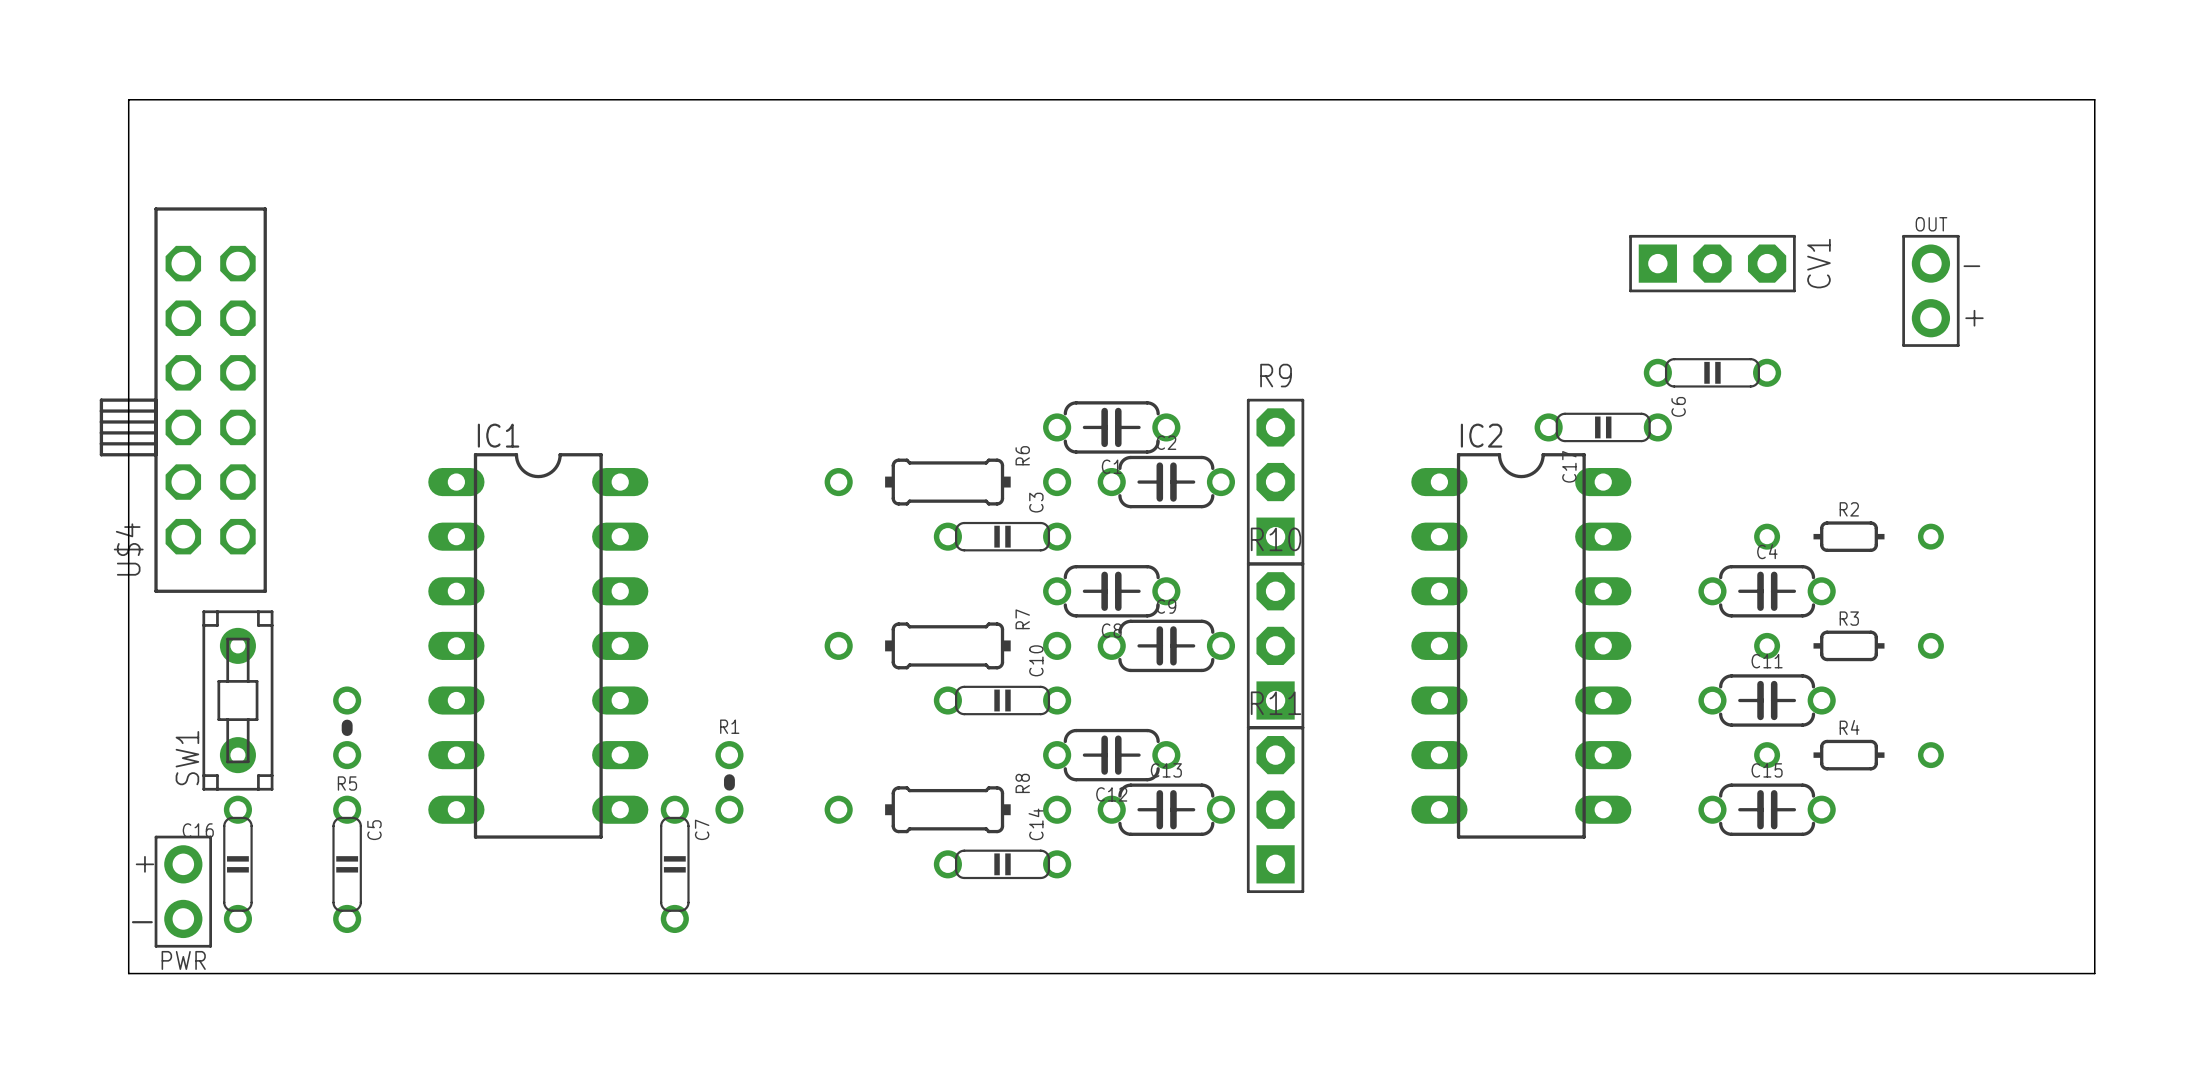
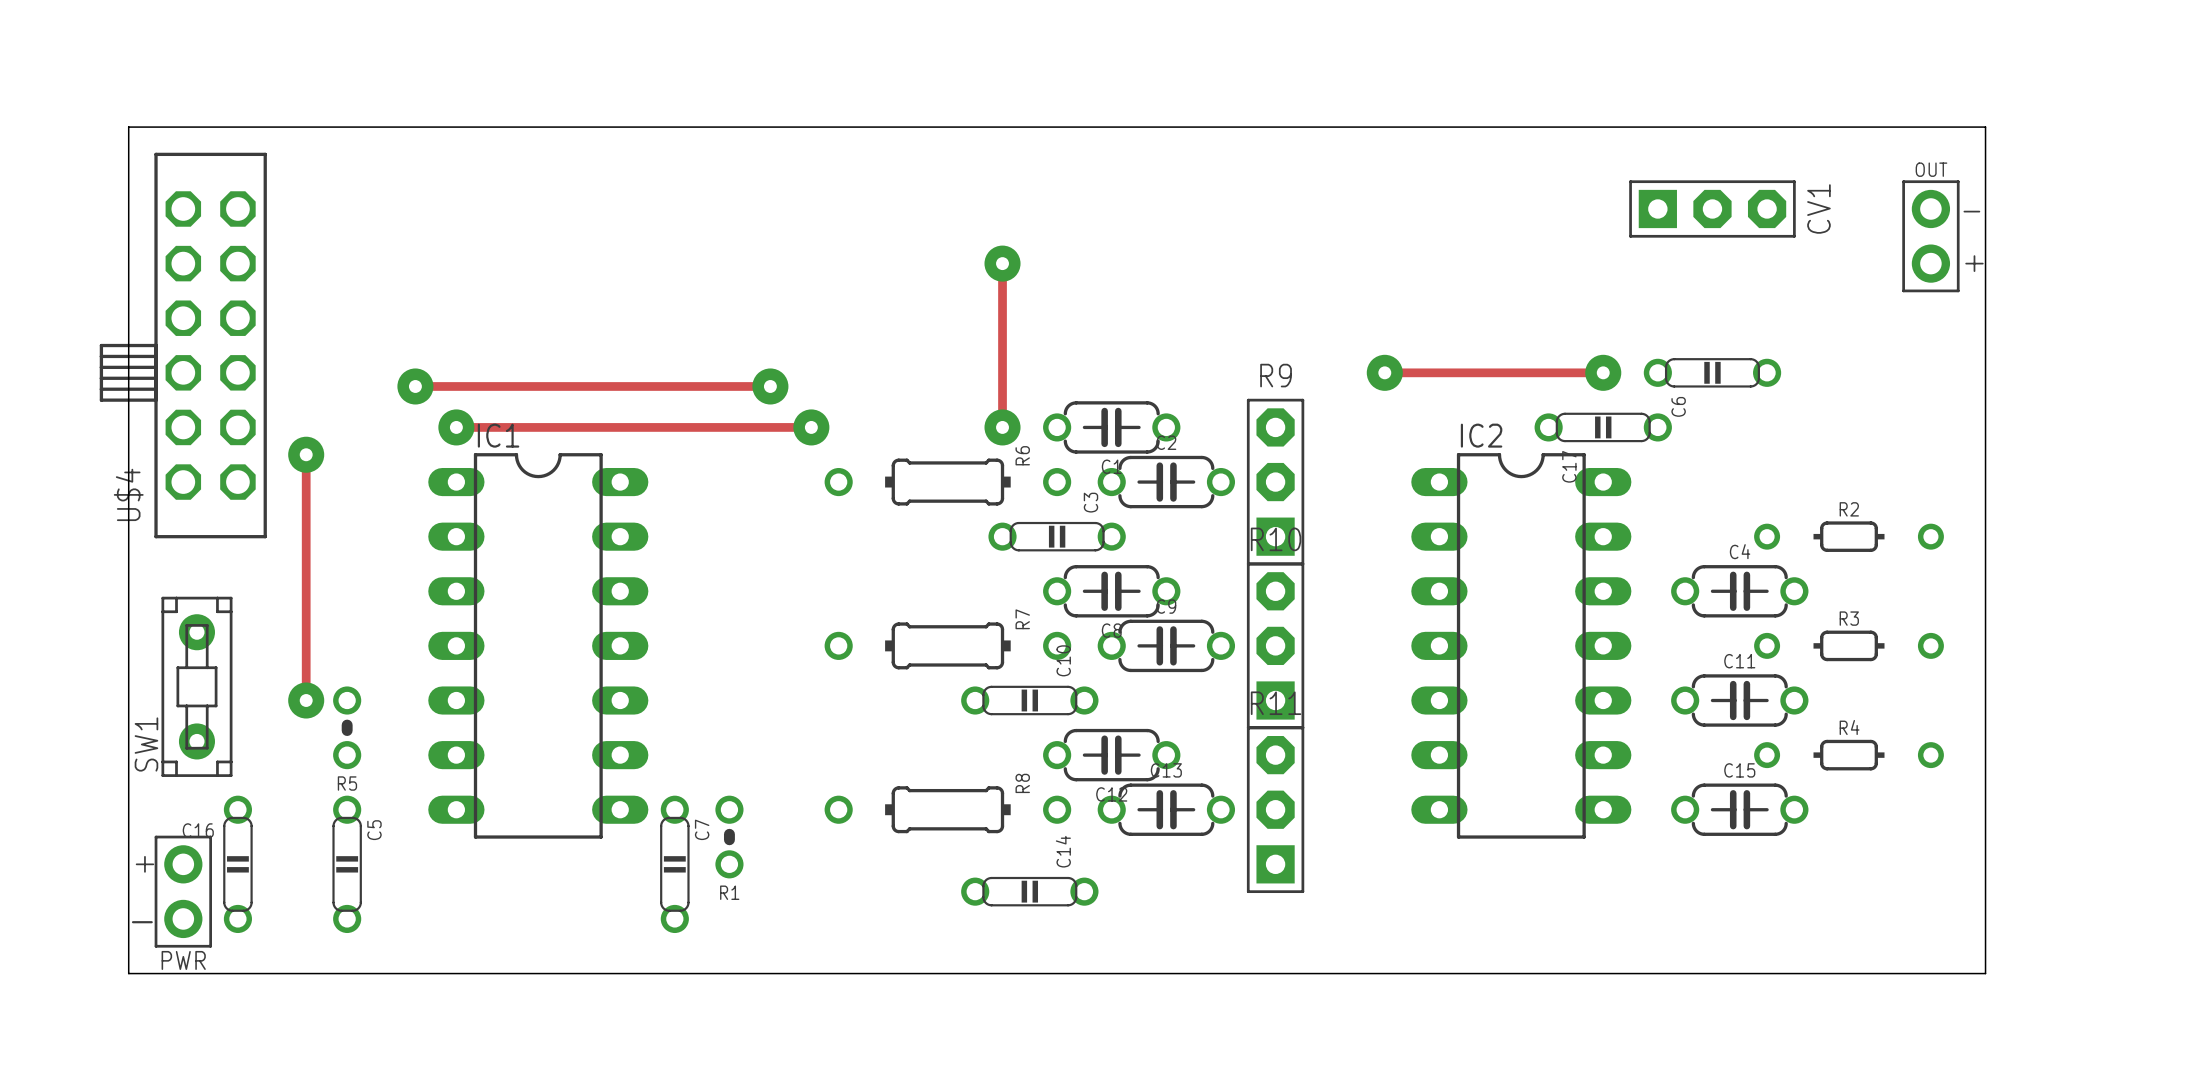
board edge: (128, 127) (128, 99) (2094, 99) (2094, 973) (1985, 973) -> (128, 127) (1985, 127) (1985, 973)
track: none -> (1002, 263) (1002, 427)
via: none -> (1002, 263)
CV1 position: (1712, 263) -> (1712, 208)
OUT position: (1930, 290) -> (1930, 236)
track: none -> (1384, 372) (1603, 372)
via: none -> (1384, 372)
via: none -> (1603, 372)
track: none -> (415, 386) (770, 386)
via: none -> (415, 386)
via: none -> (770, 386)
U$4 position: (183, 400) -> (183, 345)
track: none -> (456, 427) (811, 427)
via: none -> (456, 427)
via: none -> (811, 427)
via: none -> (1002, 427)
track: none -> (306, 454) (306, 700)
via: none -> (306, 454)
C3 position: (1002, 536) -> (1057, 536)
C4 position: (1767, 591) -> (1739, 591)
SW1 position: (237, 700) -> (196, 686)
via: none -> (306, 700)
C10 position: (1002, 700) -> (1029, 700)
C11 position: (1767, 700) -> (1739, 700)
R1 name position: R1 (729, 726) -> R1 (729, 892)
R1 position: (729, 782) -> (729, 837)
C15 position: (1767, 809) -> (1739, 809)
C14 position: (1002, 864) -> (1029, 891)

